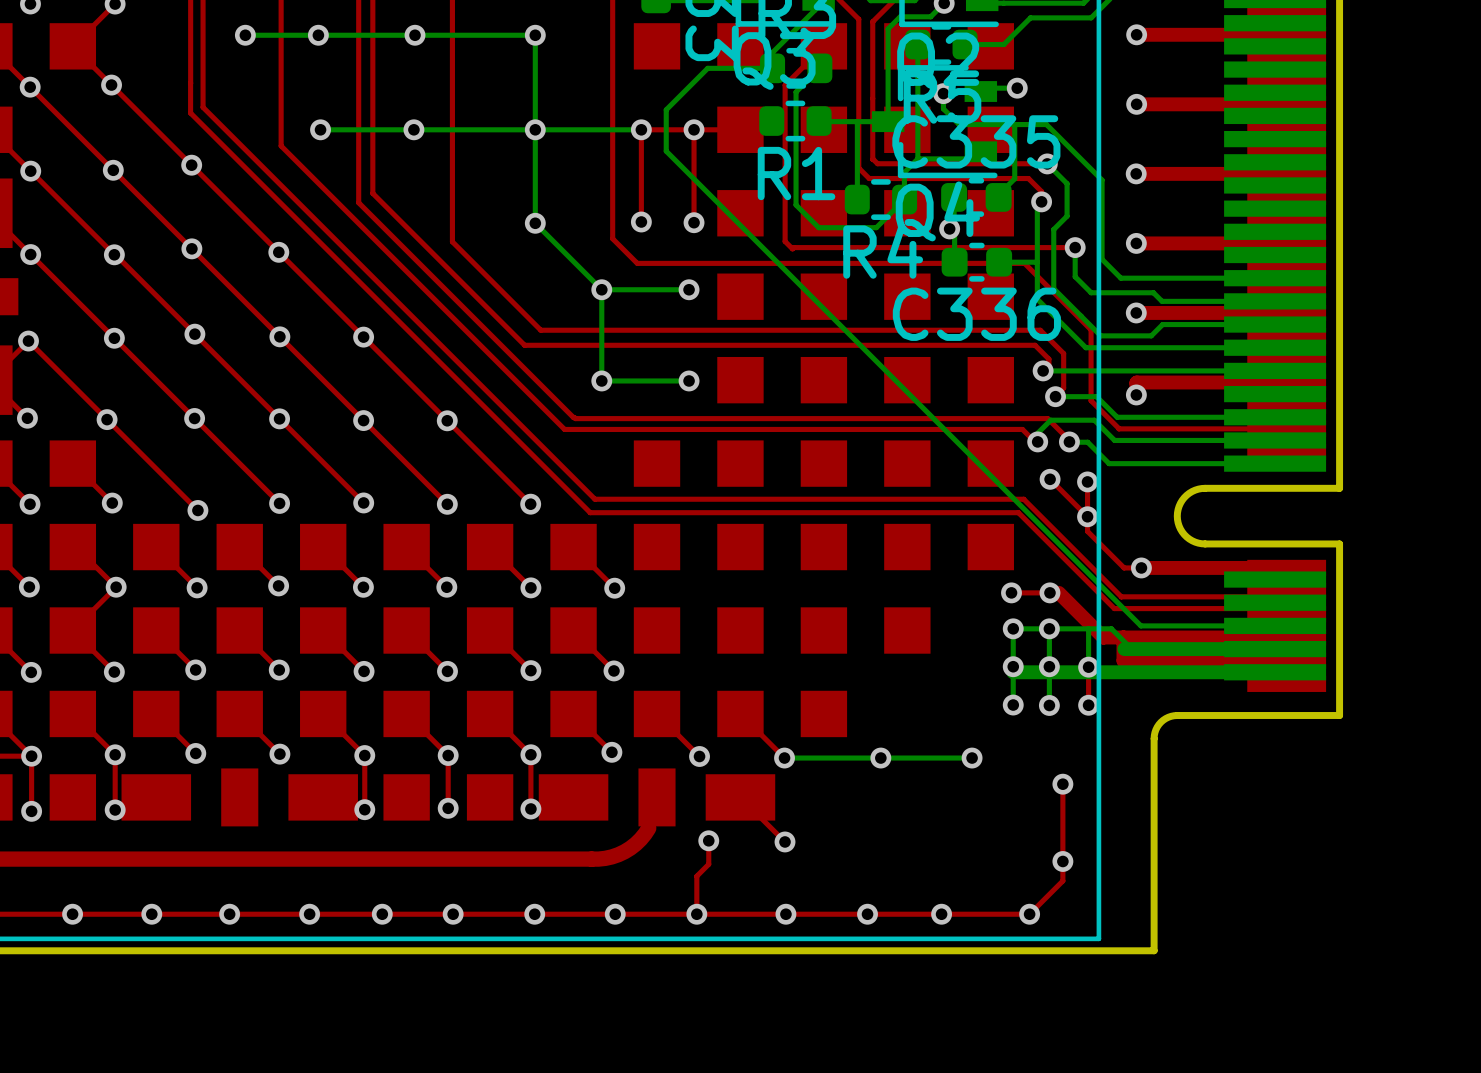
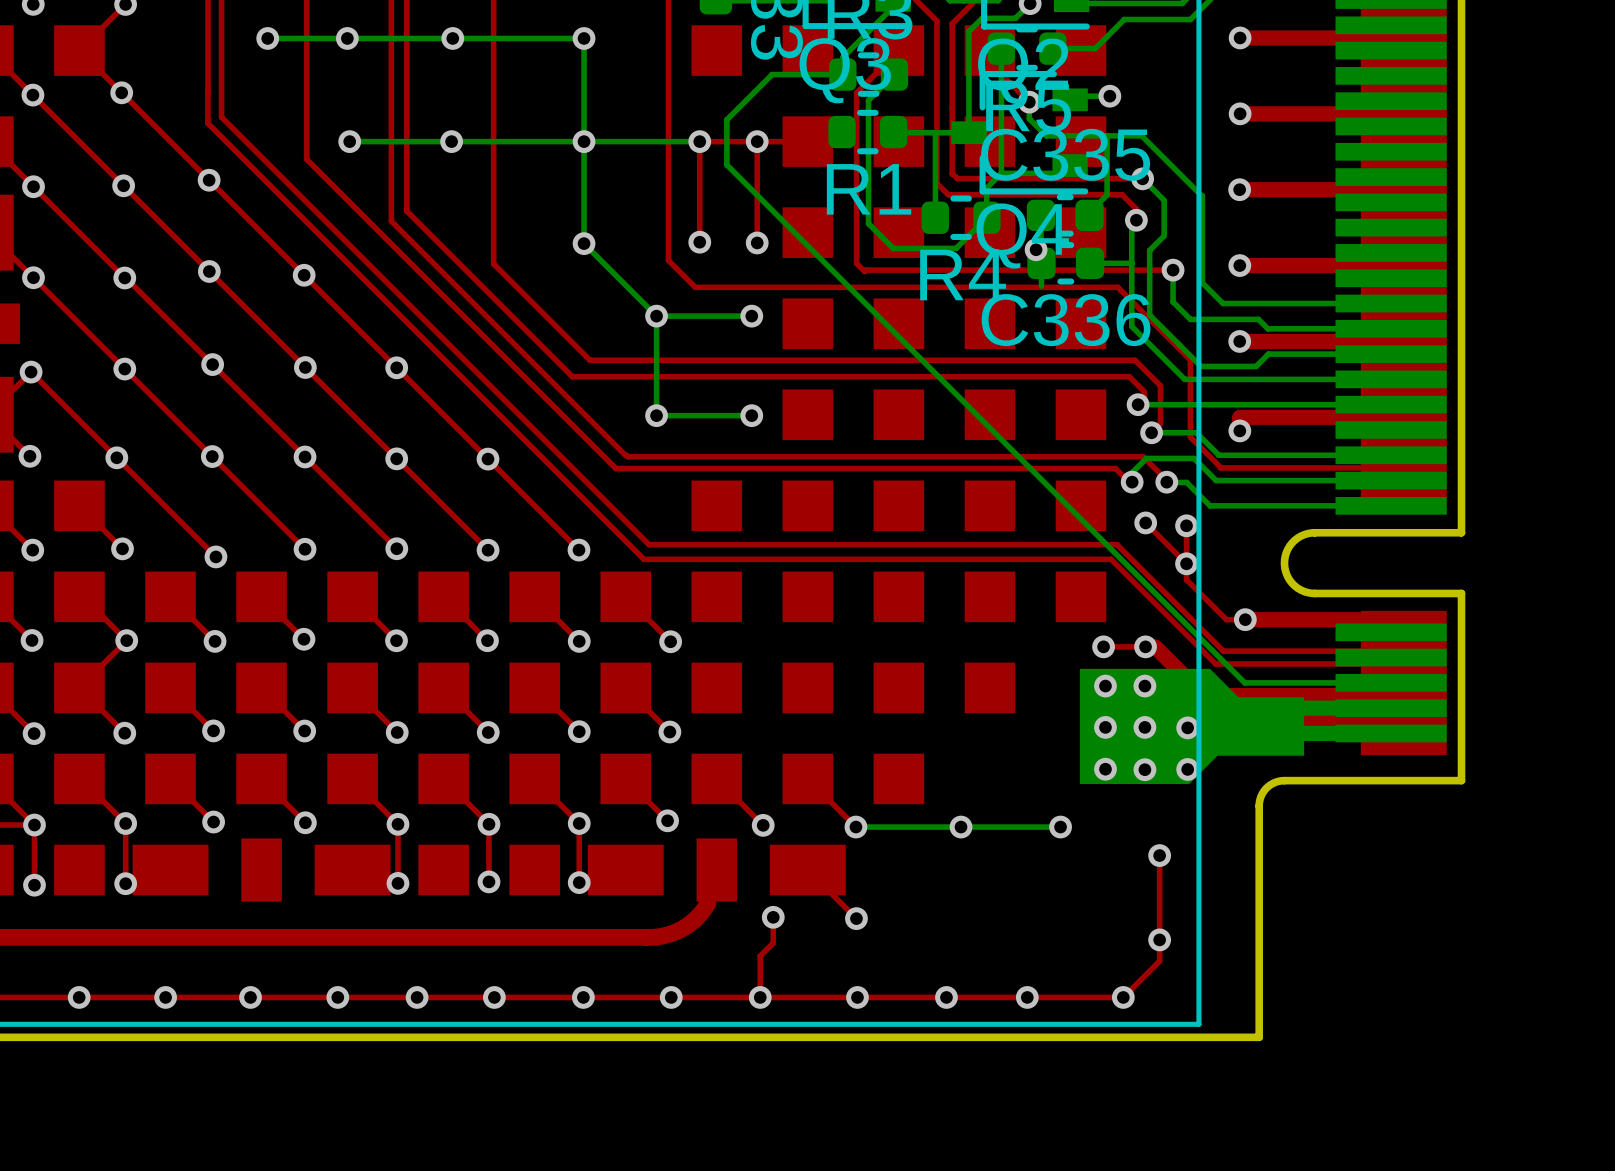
bottom track: none -> (1131, 263) (1087, 263)
C336 position: (976, 262) -> (1065, 263)
bottom track: (1037, 262) (999, 262) -> none
drawing: none -> [1079, 668, 1305, 785]

